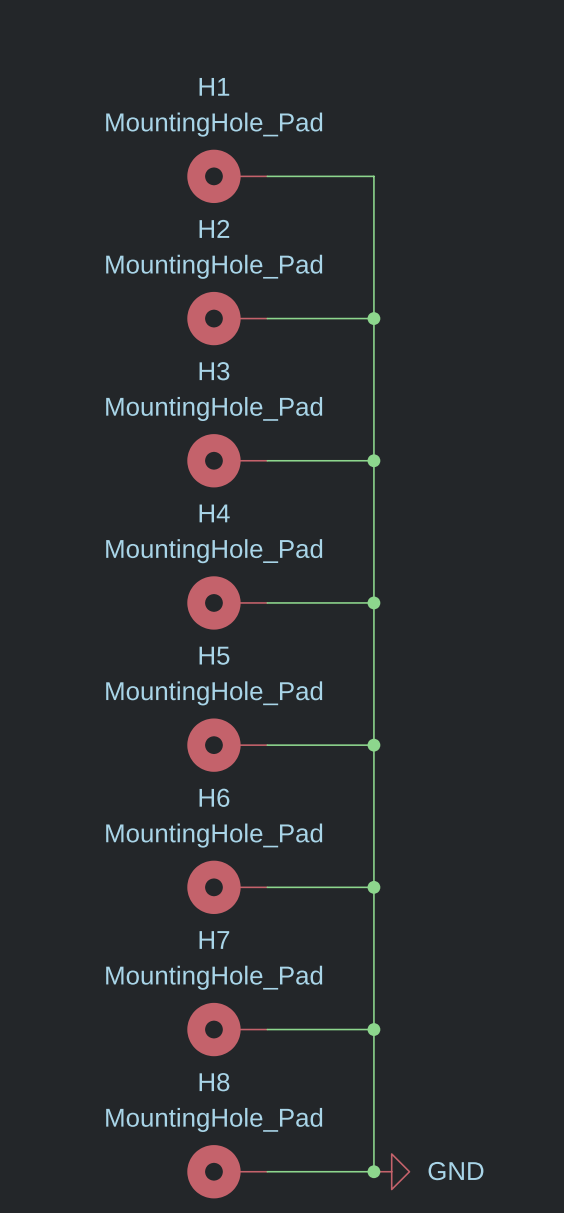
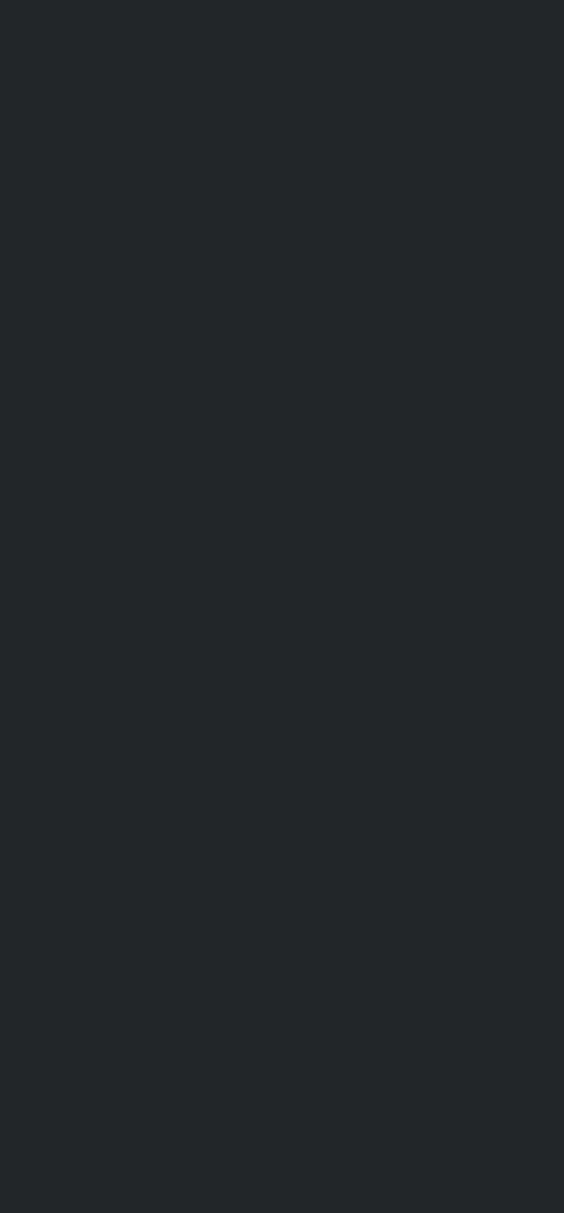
H1: MountingHole_Pad (227, 176) -> none
wire: (267, 176) (373, 176) (373, 1171) (267, 1171) -> none
H2: MountingHole_Pad (227, 318) -> none
wire: (267, 318) (373, 318) -> none
junction: (373, 318) -> none
H3: MountingHole_Pad (227, 460) -> none
wire: (267, 460) (373, 460) -> none
junction: (373, 460) -> none
H4: MountingHole_Pad (227, 602) -> none
wire: (267, 602) (373, 602) -> none
junction: (373, 602) -> none
H5: MountingHole_Pad (227, 745) -> none
wire: (267, 745) (373, 745) -> none
junction: (373, 745) -> none
H6: MountingHole_Pad (227, 887) -> none
wire: (267, 887) (373, 887) -> none
junction: (373, 887) -> none
H7: MountingHole_Pad (227, 1029) -> none
wire: (267, 1029) (373, 1029) -> none
junction: (373, 1029) -> none
H8: MountingHole_Pad (227, 1171) -> none
junction: (373, 1171) -> none
power symbol: GND (391, 1171) -> none

